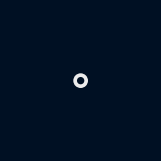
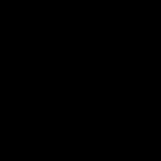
via: (80, 80) -> none

